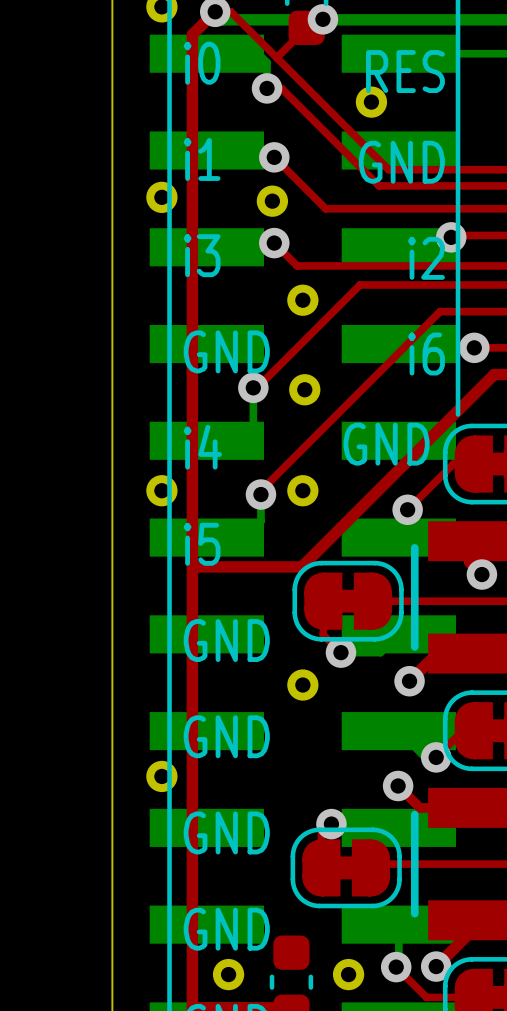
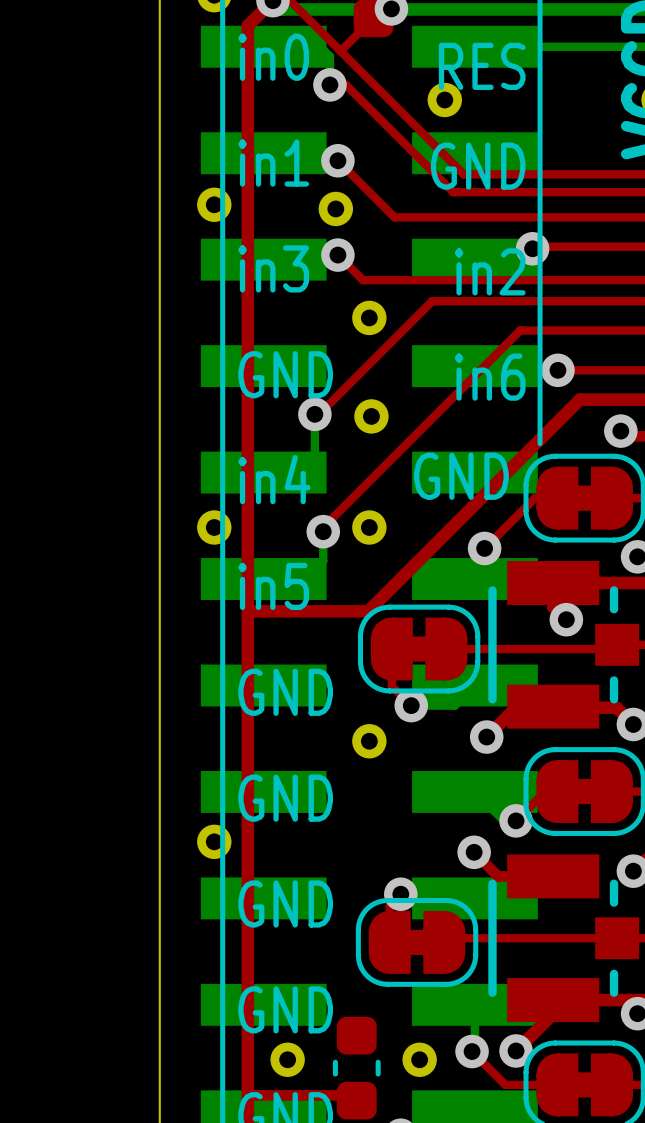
text: i0 (202, 63) -> in0 (273, 57)
text: i1 (202, 159) -> in1 (273, 163)
text: i3 (202, 255) -> in3 (273, 268)
text: i2 (426, 258) -> in2 (490, 271)
text: i6 (426, 354) -> in6 (490, 377)
text: i4 (202, 447) -> in4 (274, 479)
text: i5 (202, 544) -> in5 (273, 586)

